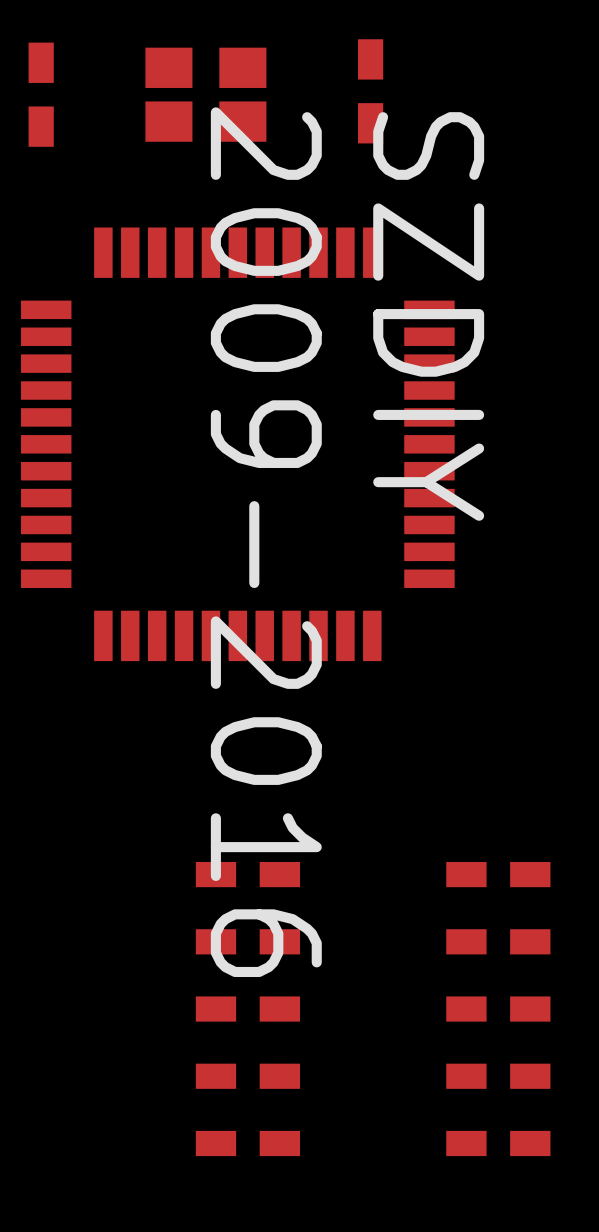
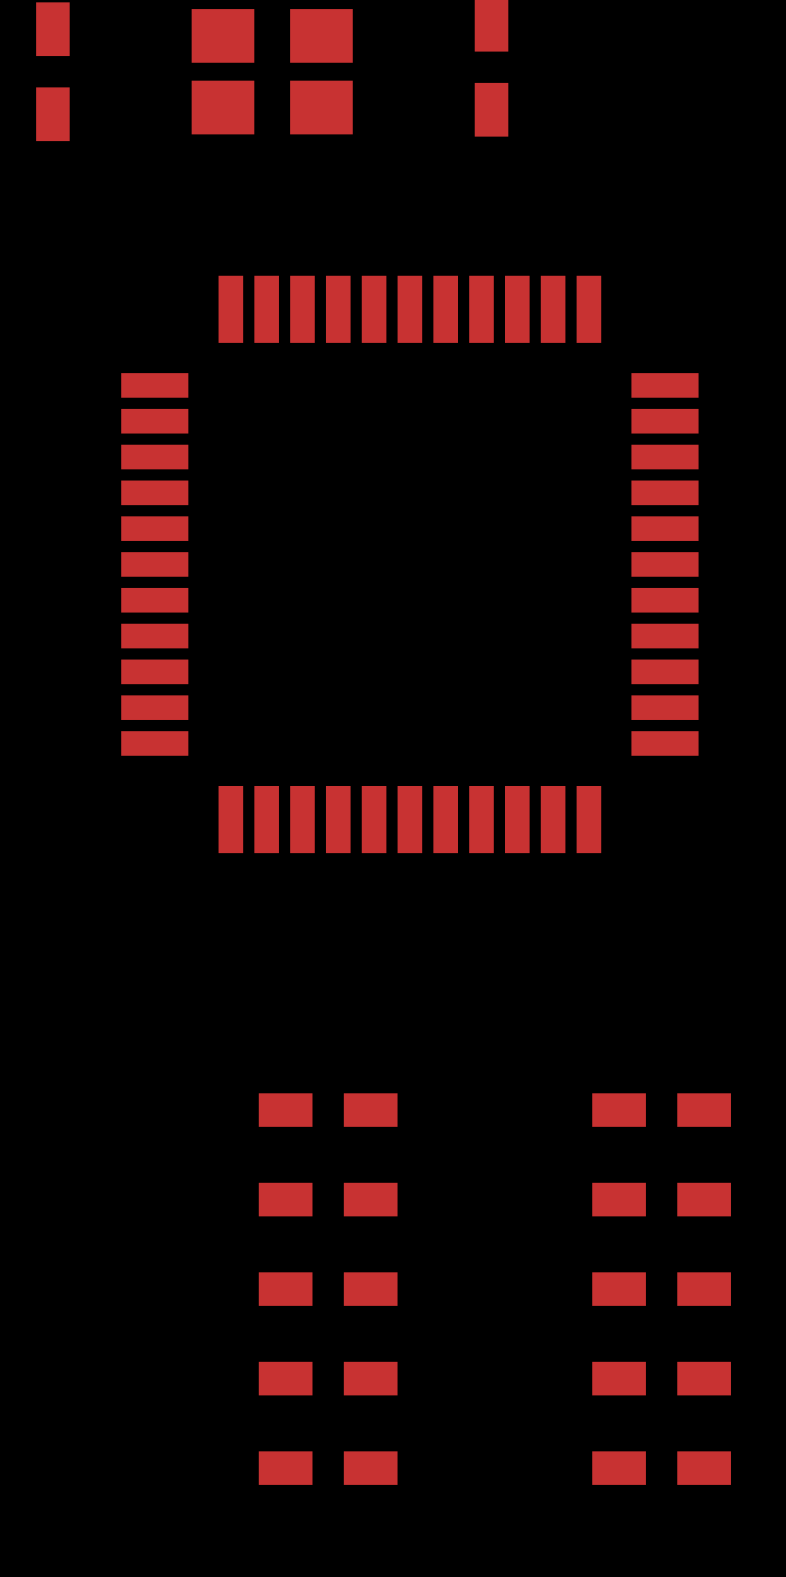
text: SZDIY (428, 316) -> none
part position: (237, 444) -> (409, 564)
text: 2009-2016 (266, 542) -> none

